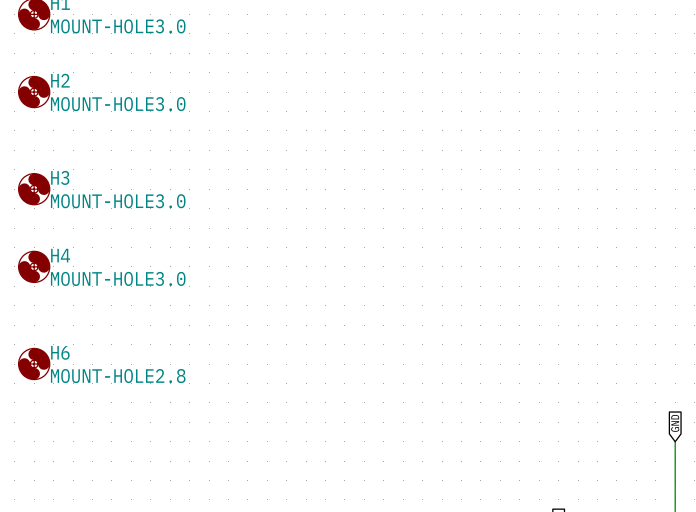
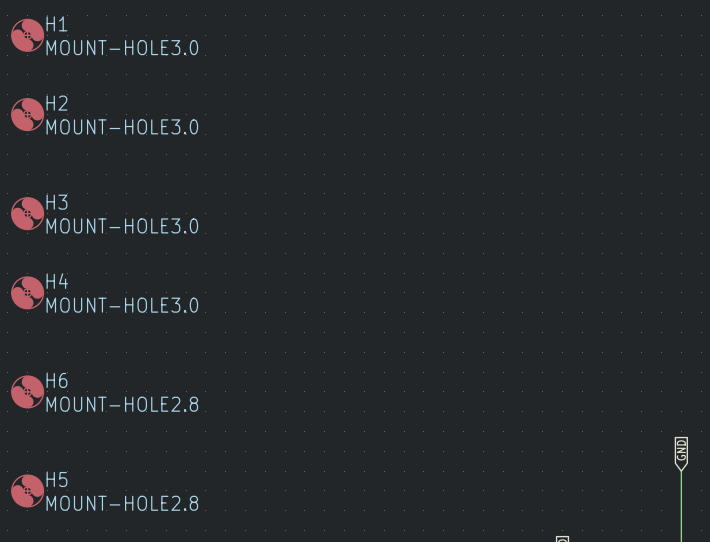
H5: none -> MOUNT-HOLE2.8 (27, 490)

